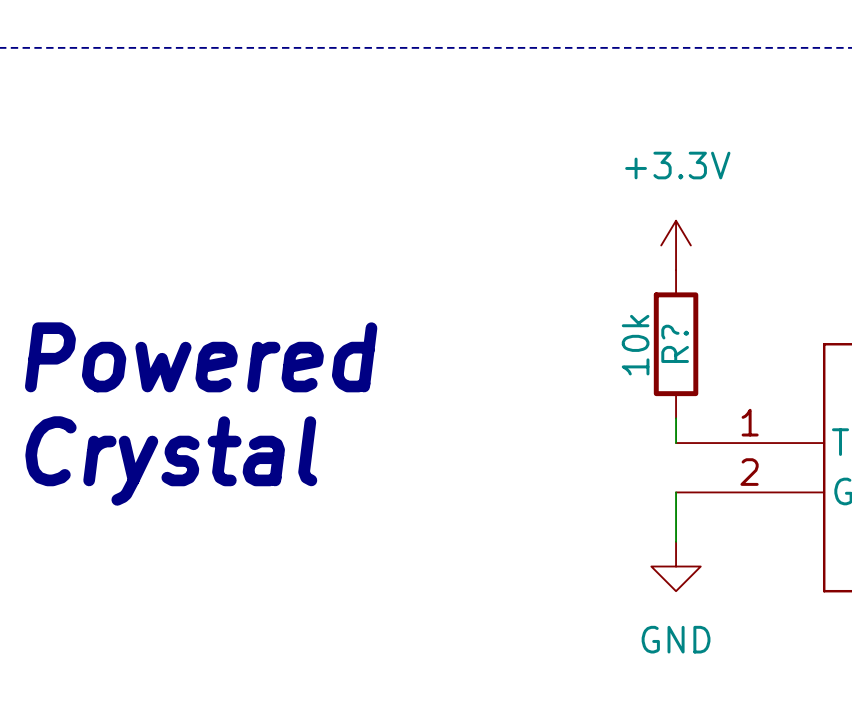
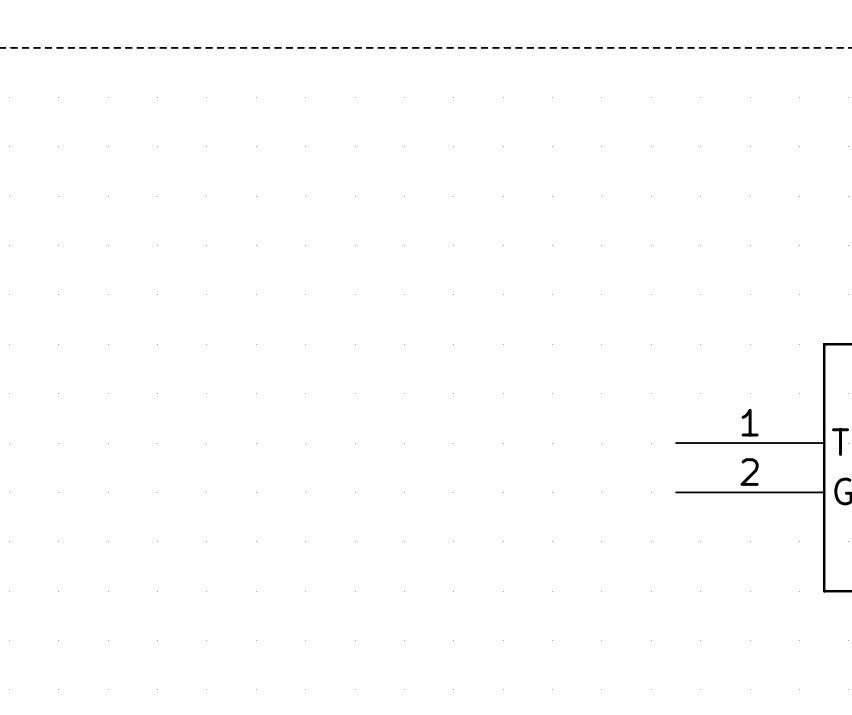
power symbol: +3.3V (676, 245) -> none
R?: 10k (676, 344) -> none
text: Powered (201, 357) -> none
wire: (676, 418) (676, 443) -> none
text: Crystal (171, 460) -> none
wire: (676, 492) (676, 541) -> none
power symbol: GND (676, 566) -> none

